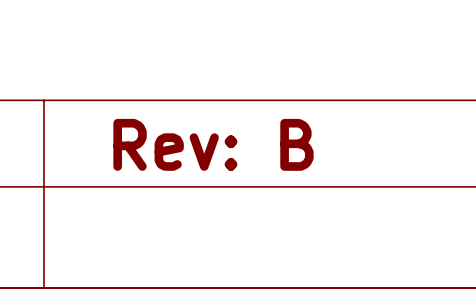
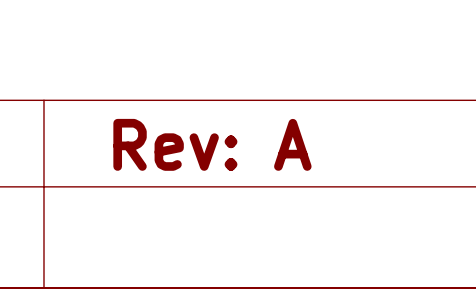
title block: Rev: B (213, 144) -> Rev: A (212, 144)

